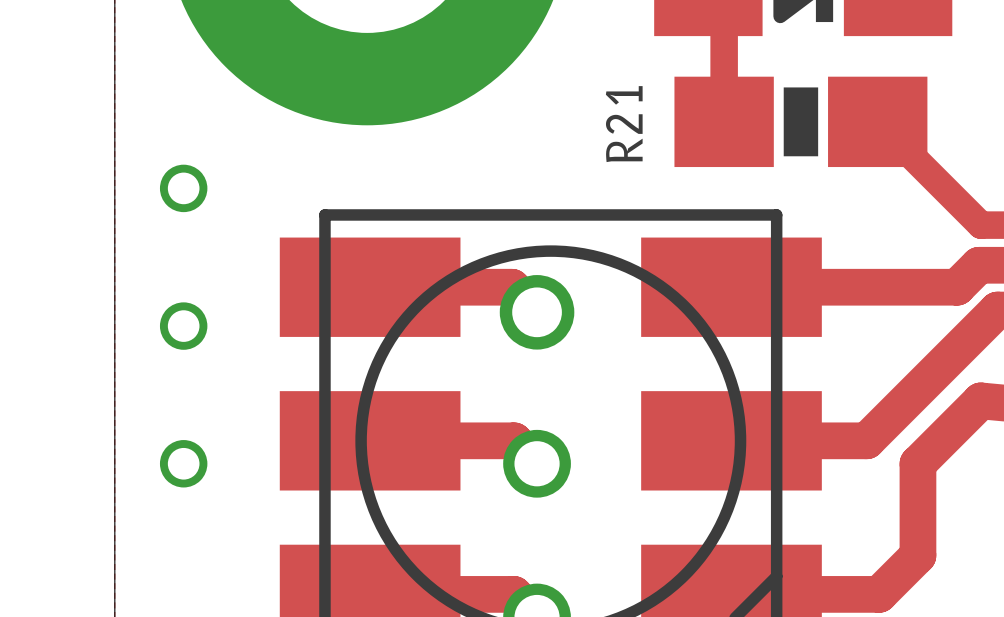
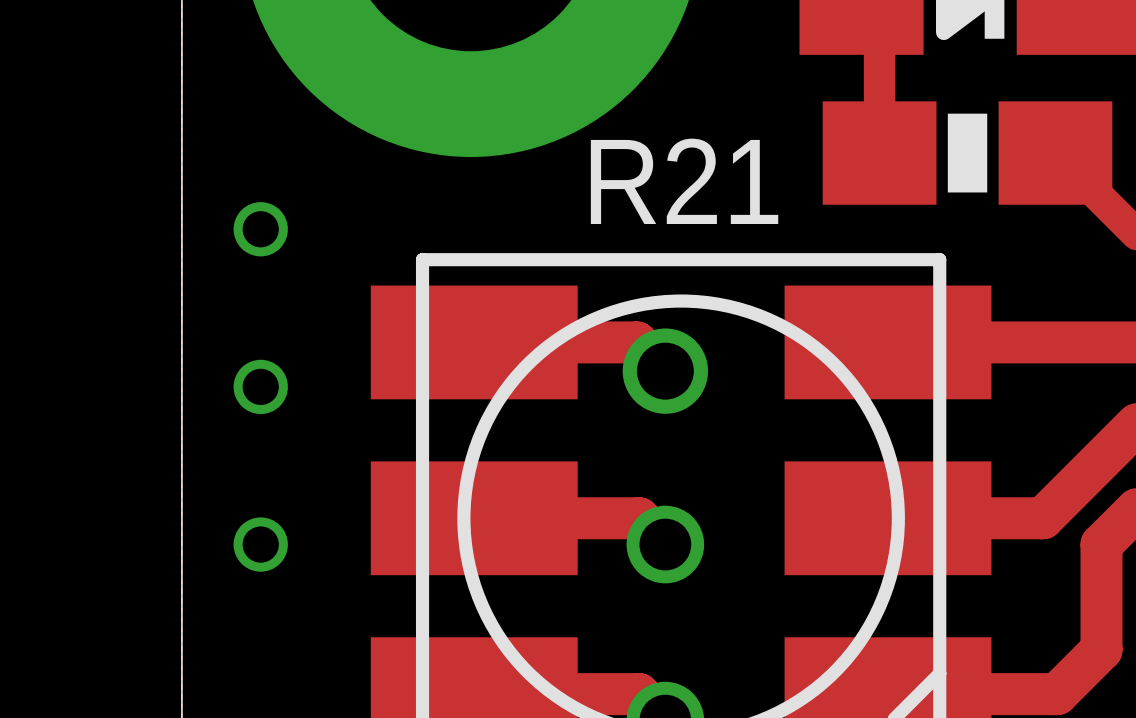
text: R21 (624, 124) -> none
R21 name: none -> R21 (684, 181)

